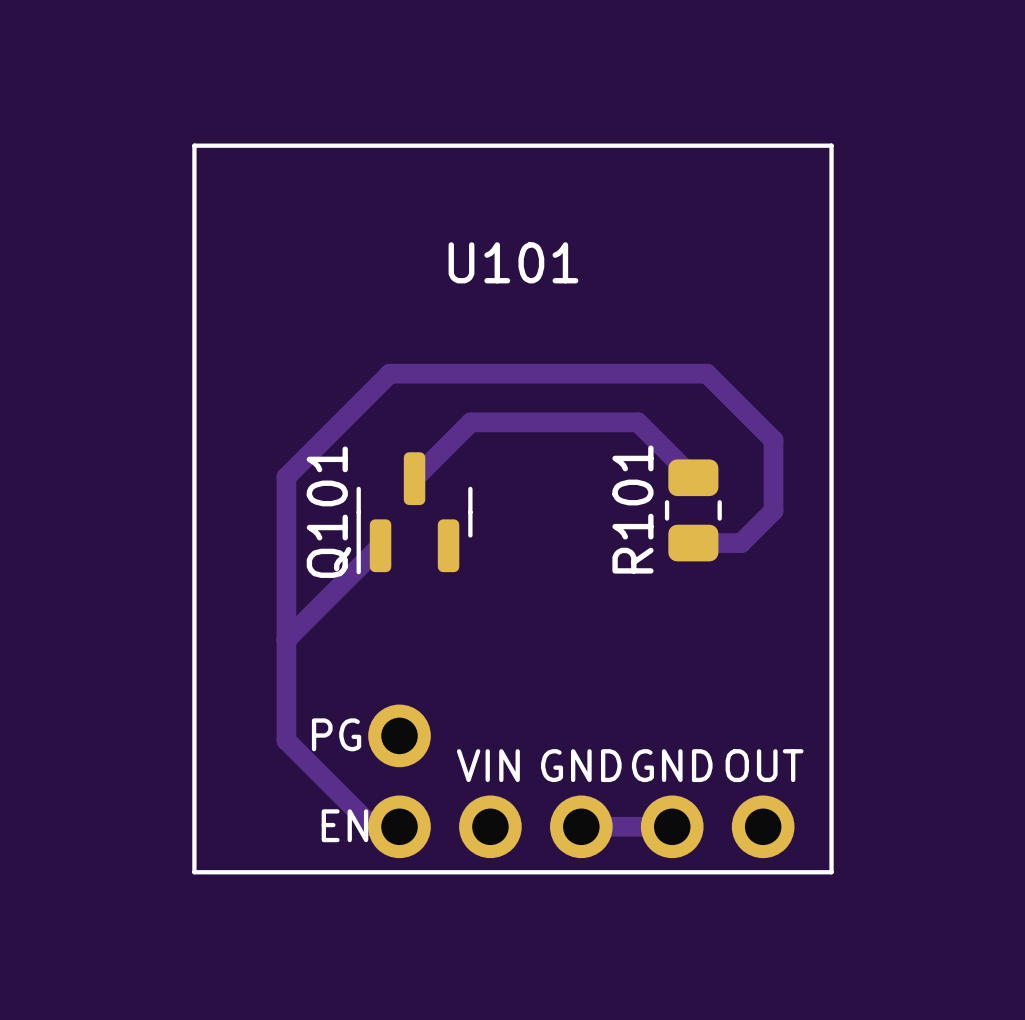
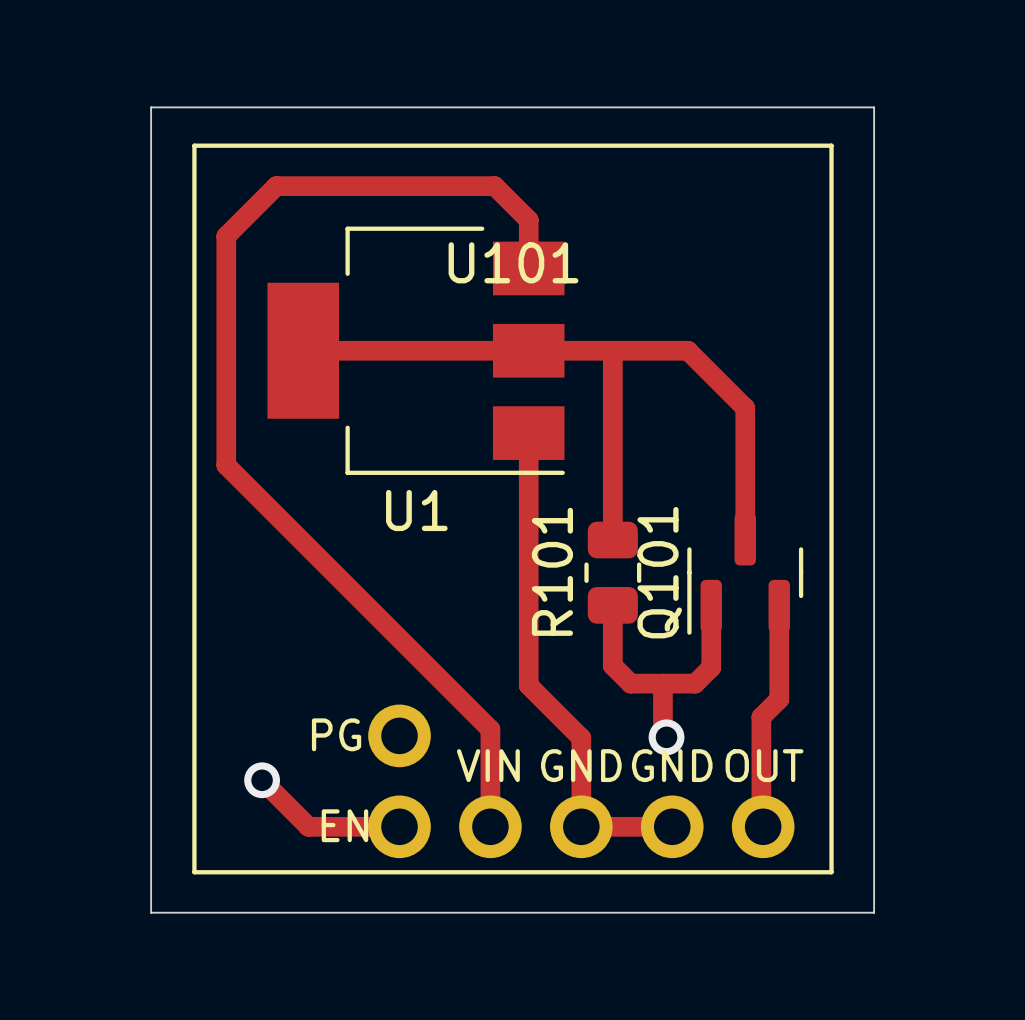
board edge: none -> (151, 107) (874, 107) (874, 912) (151, 912) (151, 107)
track: none -> (528, 268) (528, 220) (494, 186) (276, 186) (226, 236) (226, 465) (490, 729) (490, 826)
track: none -> (303, 350) (688, 350) (745, 408) (745, 539)
U1: none -> (416, 350)
track: none -> (616, 350) (612, 354) (612, 540)
track: none -> (528, 433) (528, 685) (581, 738) (581, 826)
track: (414, 478) (470, 422) (637, 422) (692, 478) -> none
R101 position: (693, 510) -> (612, 572)
Q101 position: (414, 513) -> (745, 573)
track: (693, 543) (741, 543) (773, 510) (773, 440) (706, 373) (389, 373) (286, 477) (286, 740) (372, 826) -> (262, 780) (308, 826) (372, 826)
track: (380, 545) (286, 639) -> none
track: none -> (612, 605) (612, 665) (630, 683) (695, 683) (711, 667) (711, 606)
track: none -> (779, 606) (779, 699) (761, 717) (761, 825) (763, 826)
track: none -> (662, 683) (662, 733) (666, 737)
via: none -> (666, 737)
via: none -> (262, 780)

